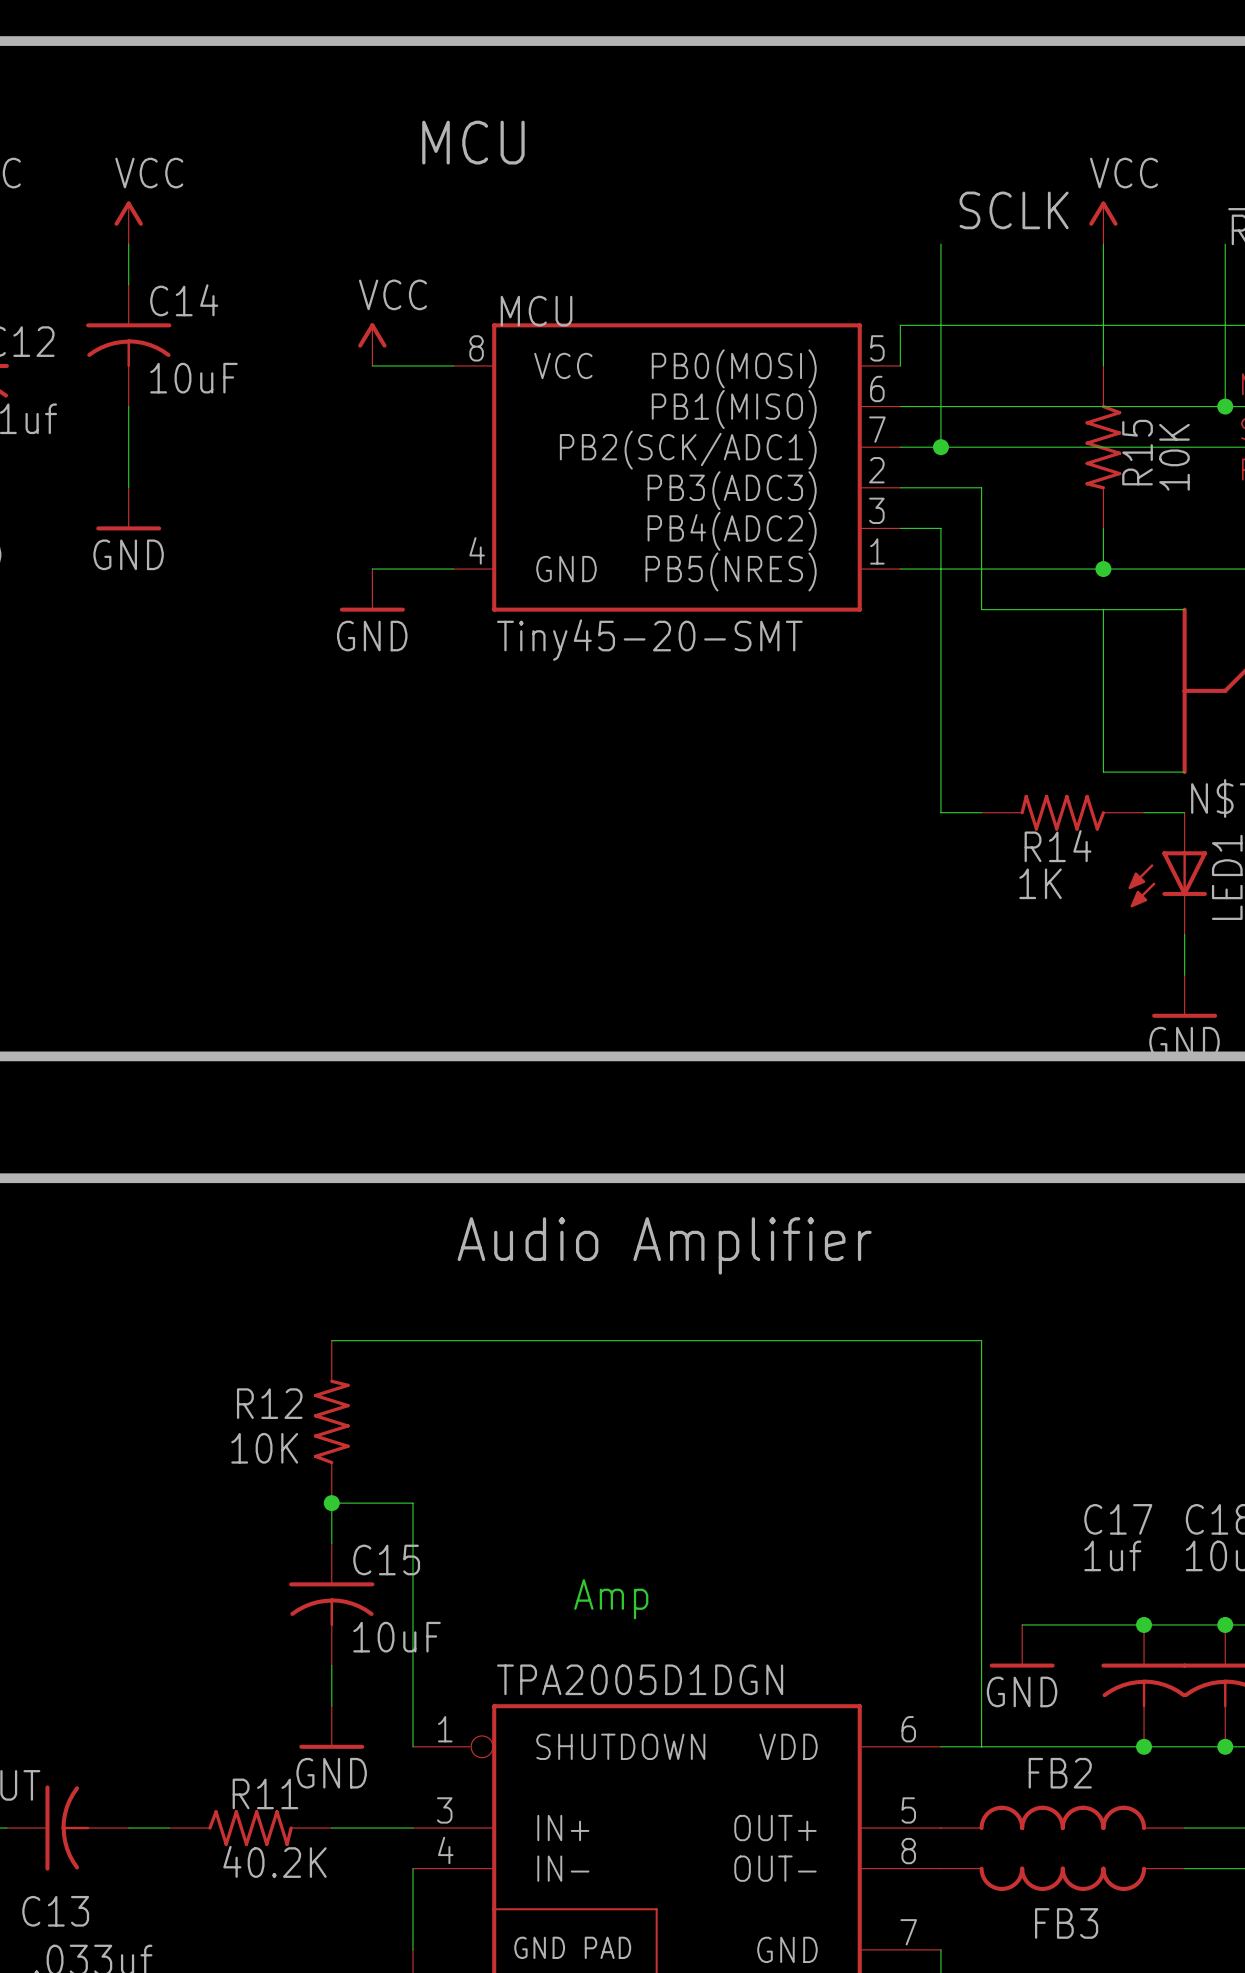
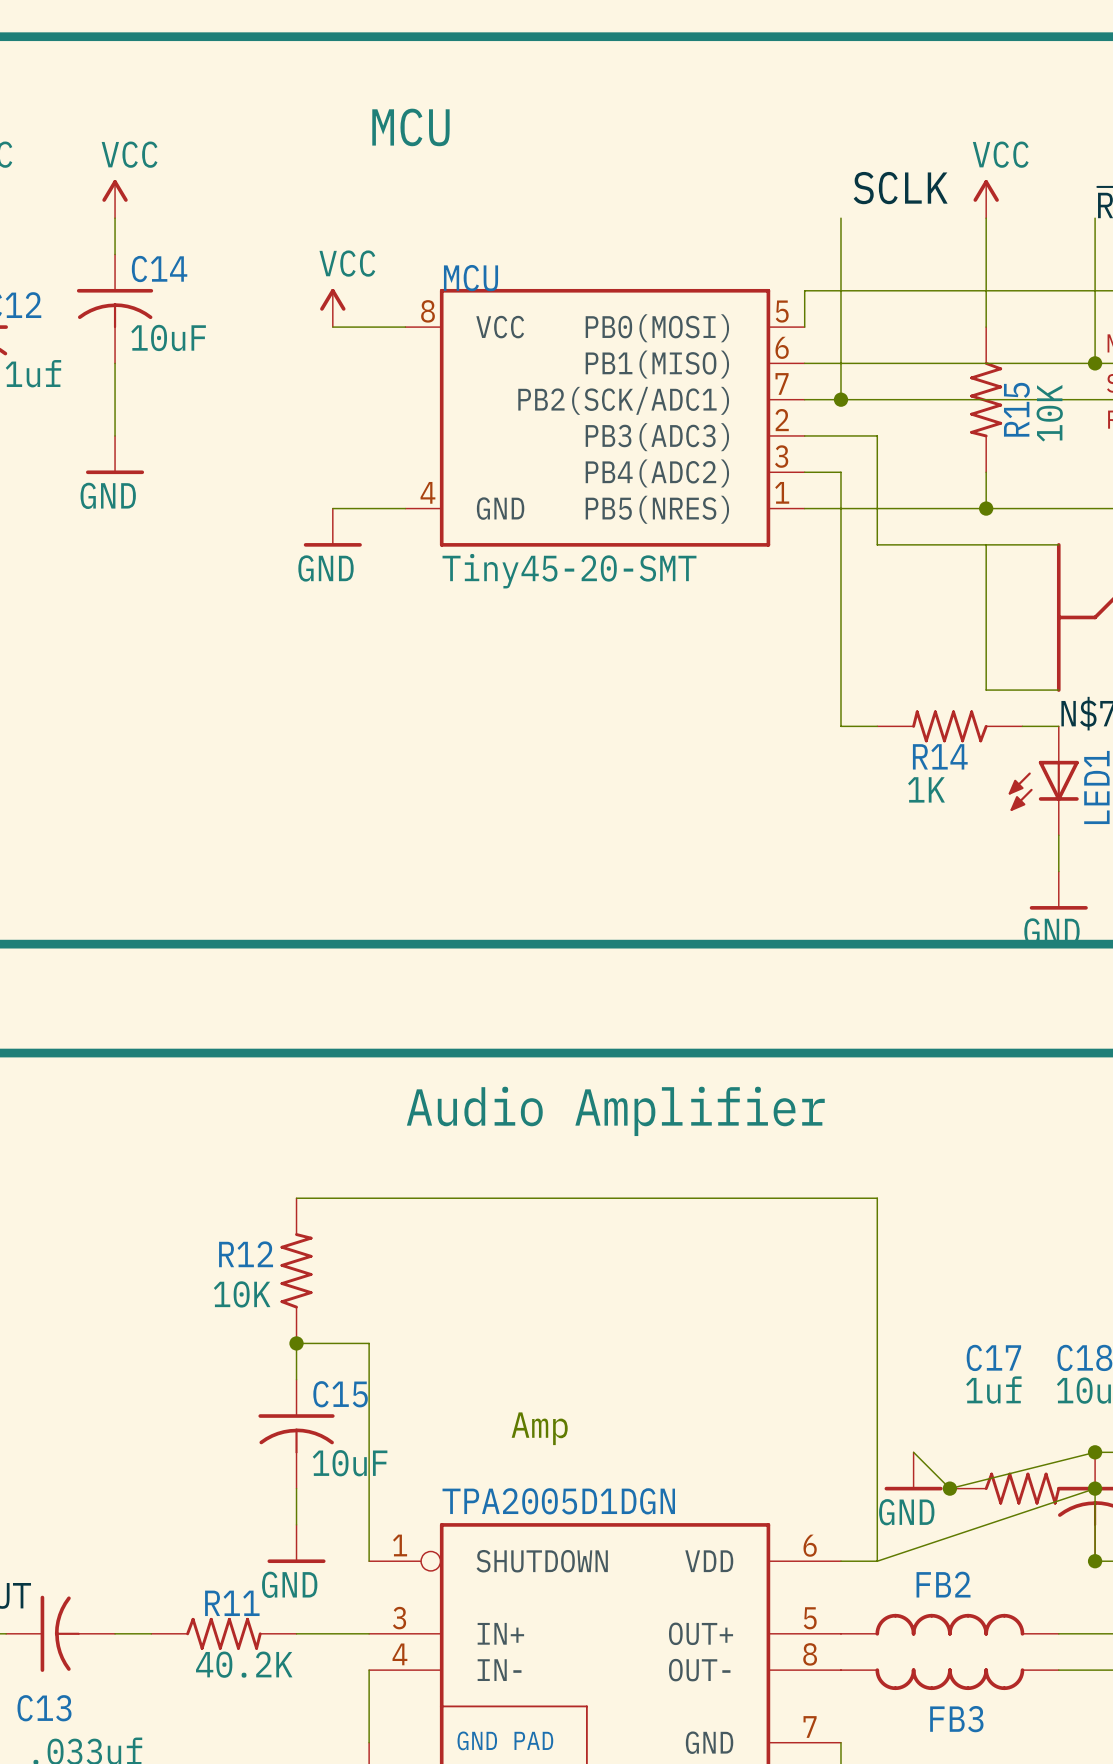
wire: (1022, 1624) (1225, 1624) -> (913, 1452) (949, 1488) (1095, 1452)
C17 symbol: [1101, 1624, 1187, 1747] -> [949, 1472, 1096, 1505]
junction: (1144, 1624) -> none
junction: none -> (949, 1488)
junction: none -> (1095, 1488)
wire: (981, 1746) (1225, 1746) -> (877, 1561) (1095, 1488) (1095, 1561)
junction: (1144, 1746) -> none

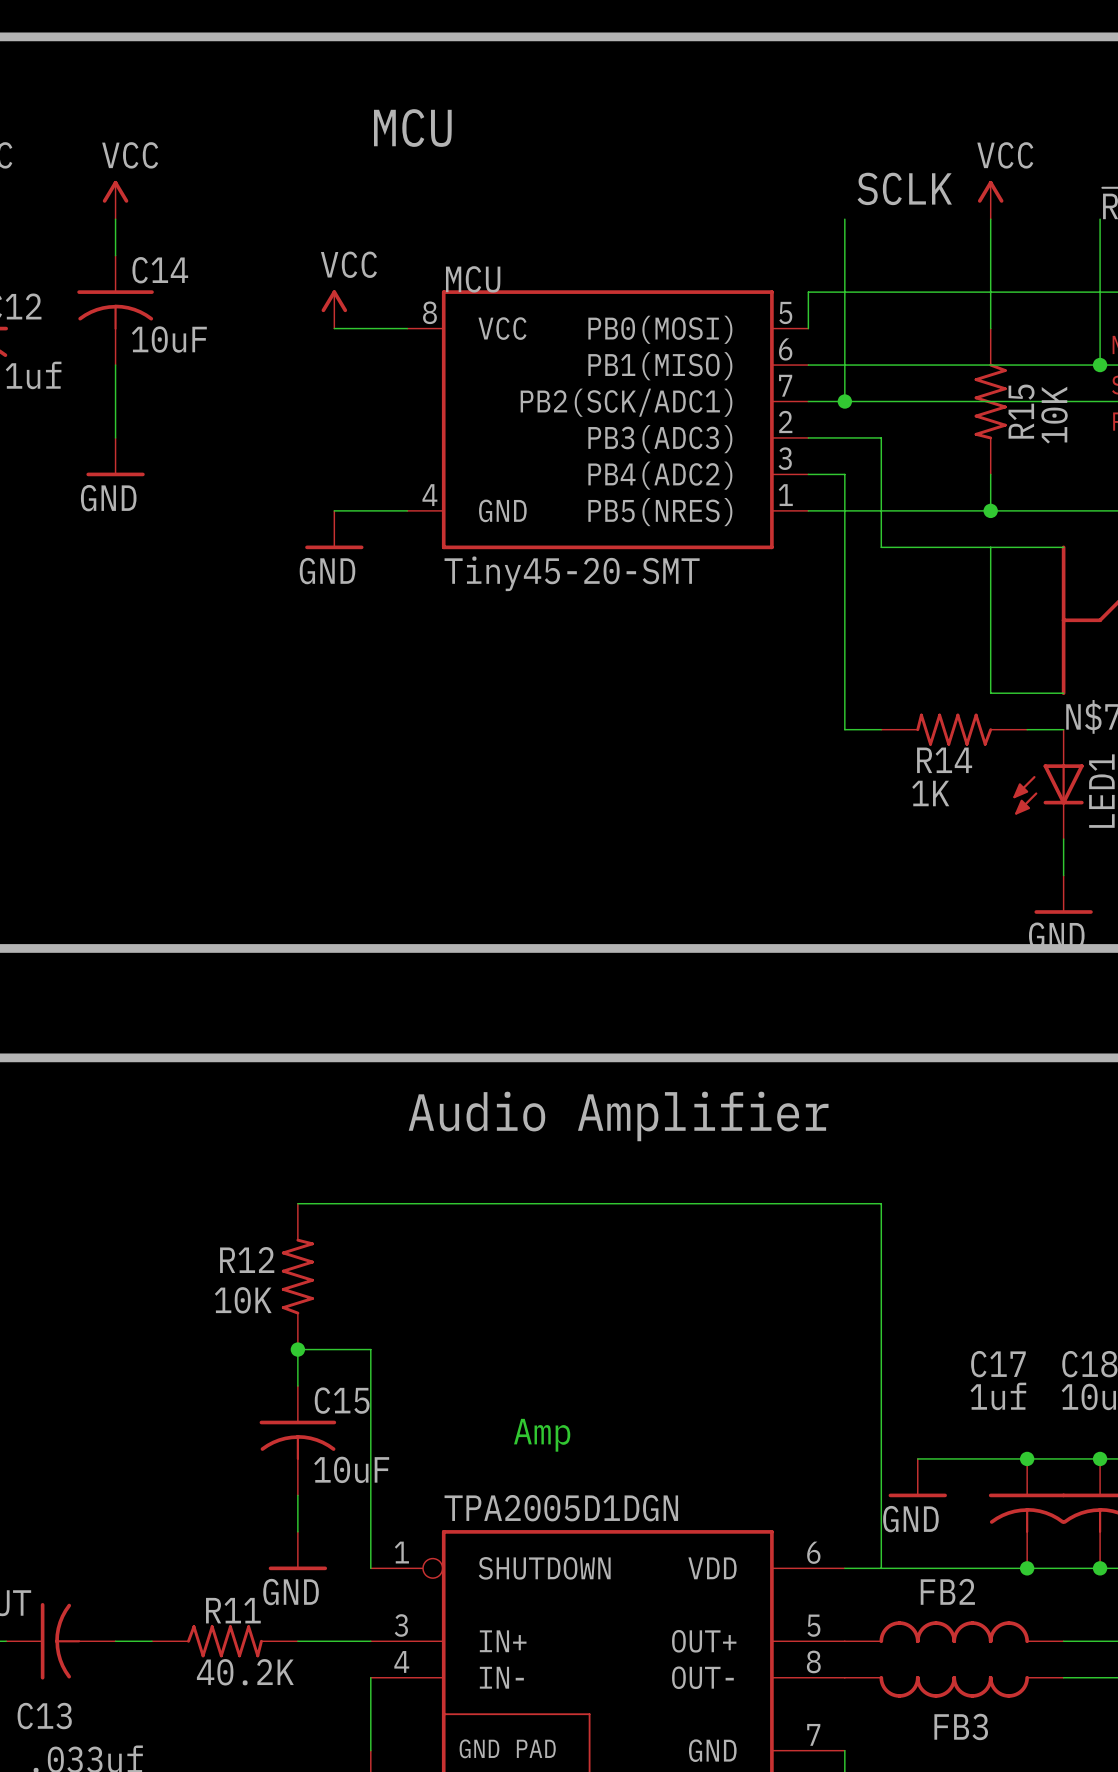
wire: (913, 1452) (949, 1488) (1095, 1452) -> (917, 1458) (1100, 1458)
junction: none -> (1027, 1458)
C17 symbol: [949, 1472, 1096, 1505] -> [988, 1458, 1066, 1569]
junction: (949, 1488) -> none
junction: (1095, 1488) -> none
wire: (877, 1561) (1095, 1488) (1095, 1561) -> (881, 1568) (1100, 1568)
junction: none -> (1027, 1568)

